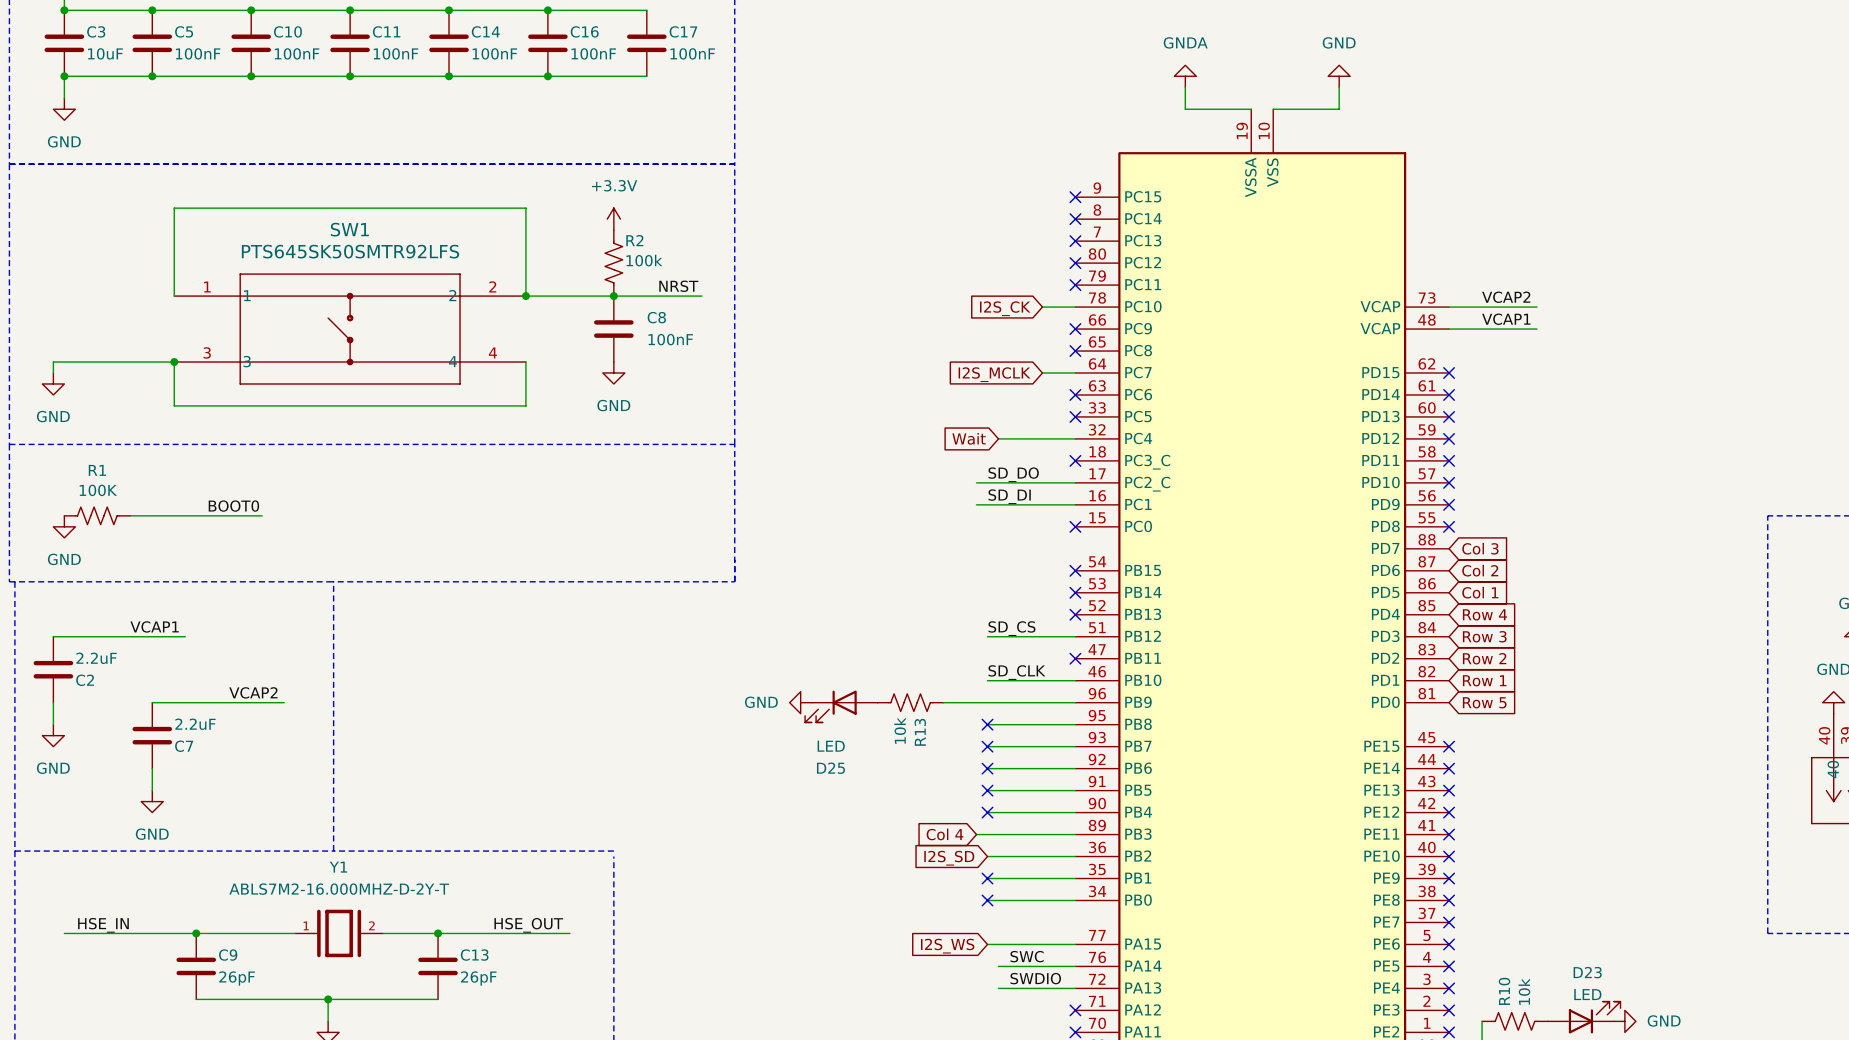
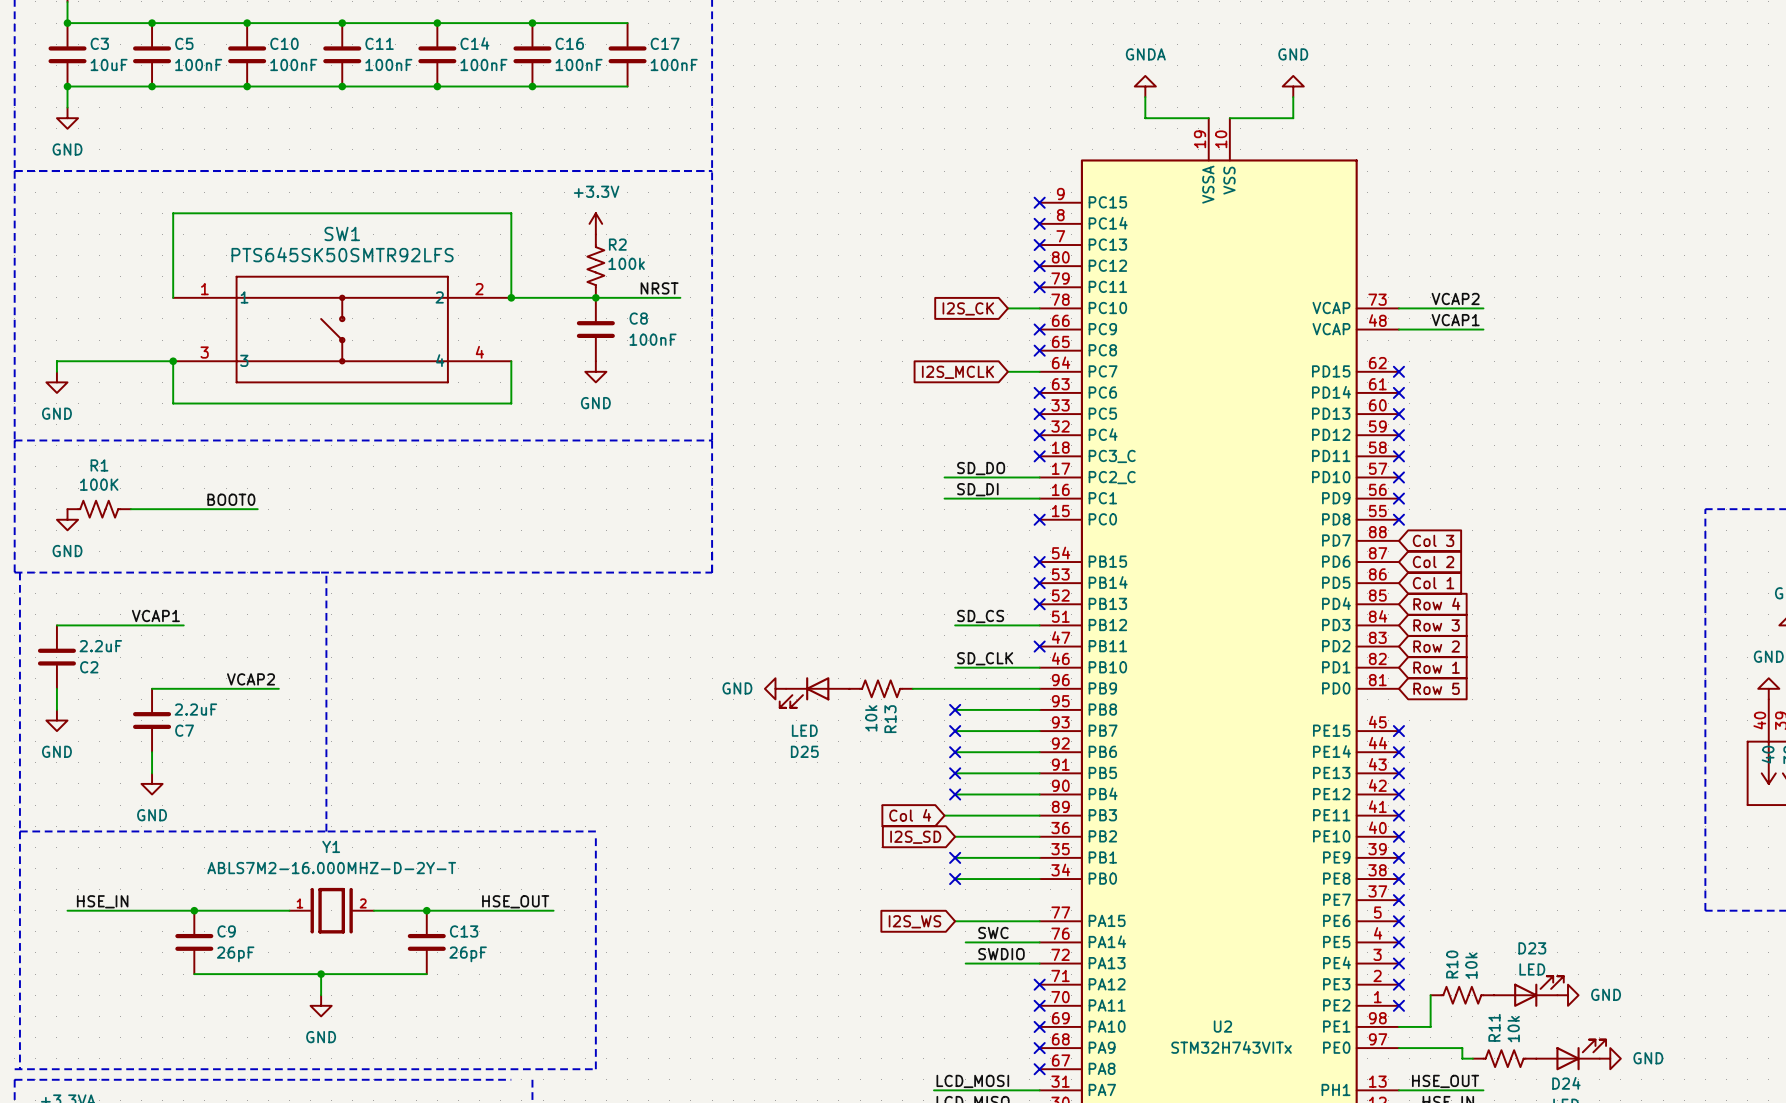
global label: Wait (969, 438) -> none
wire: (998, 438) (1075, 438) -> none
no-connect mark: none -> (1039, 435)

